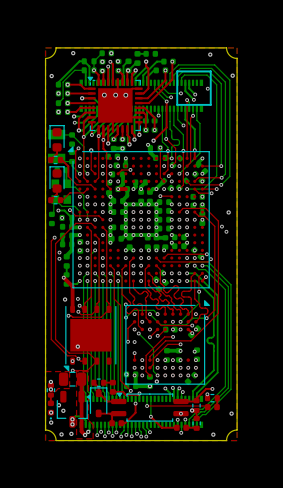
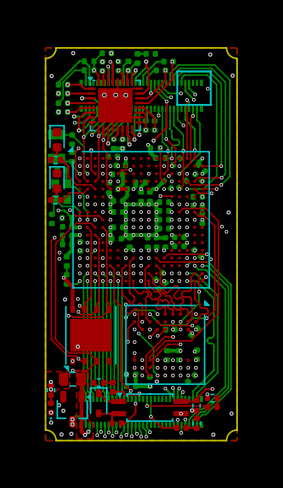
bottom track: none -> (150, 82) (150, 93)
via: none -> (150, 93)

